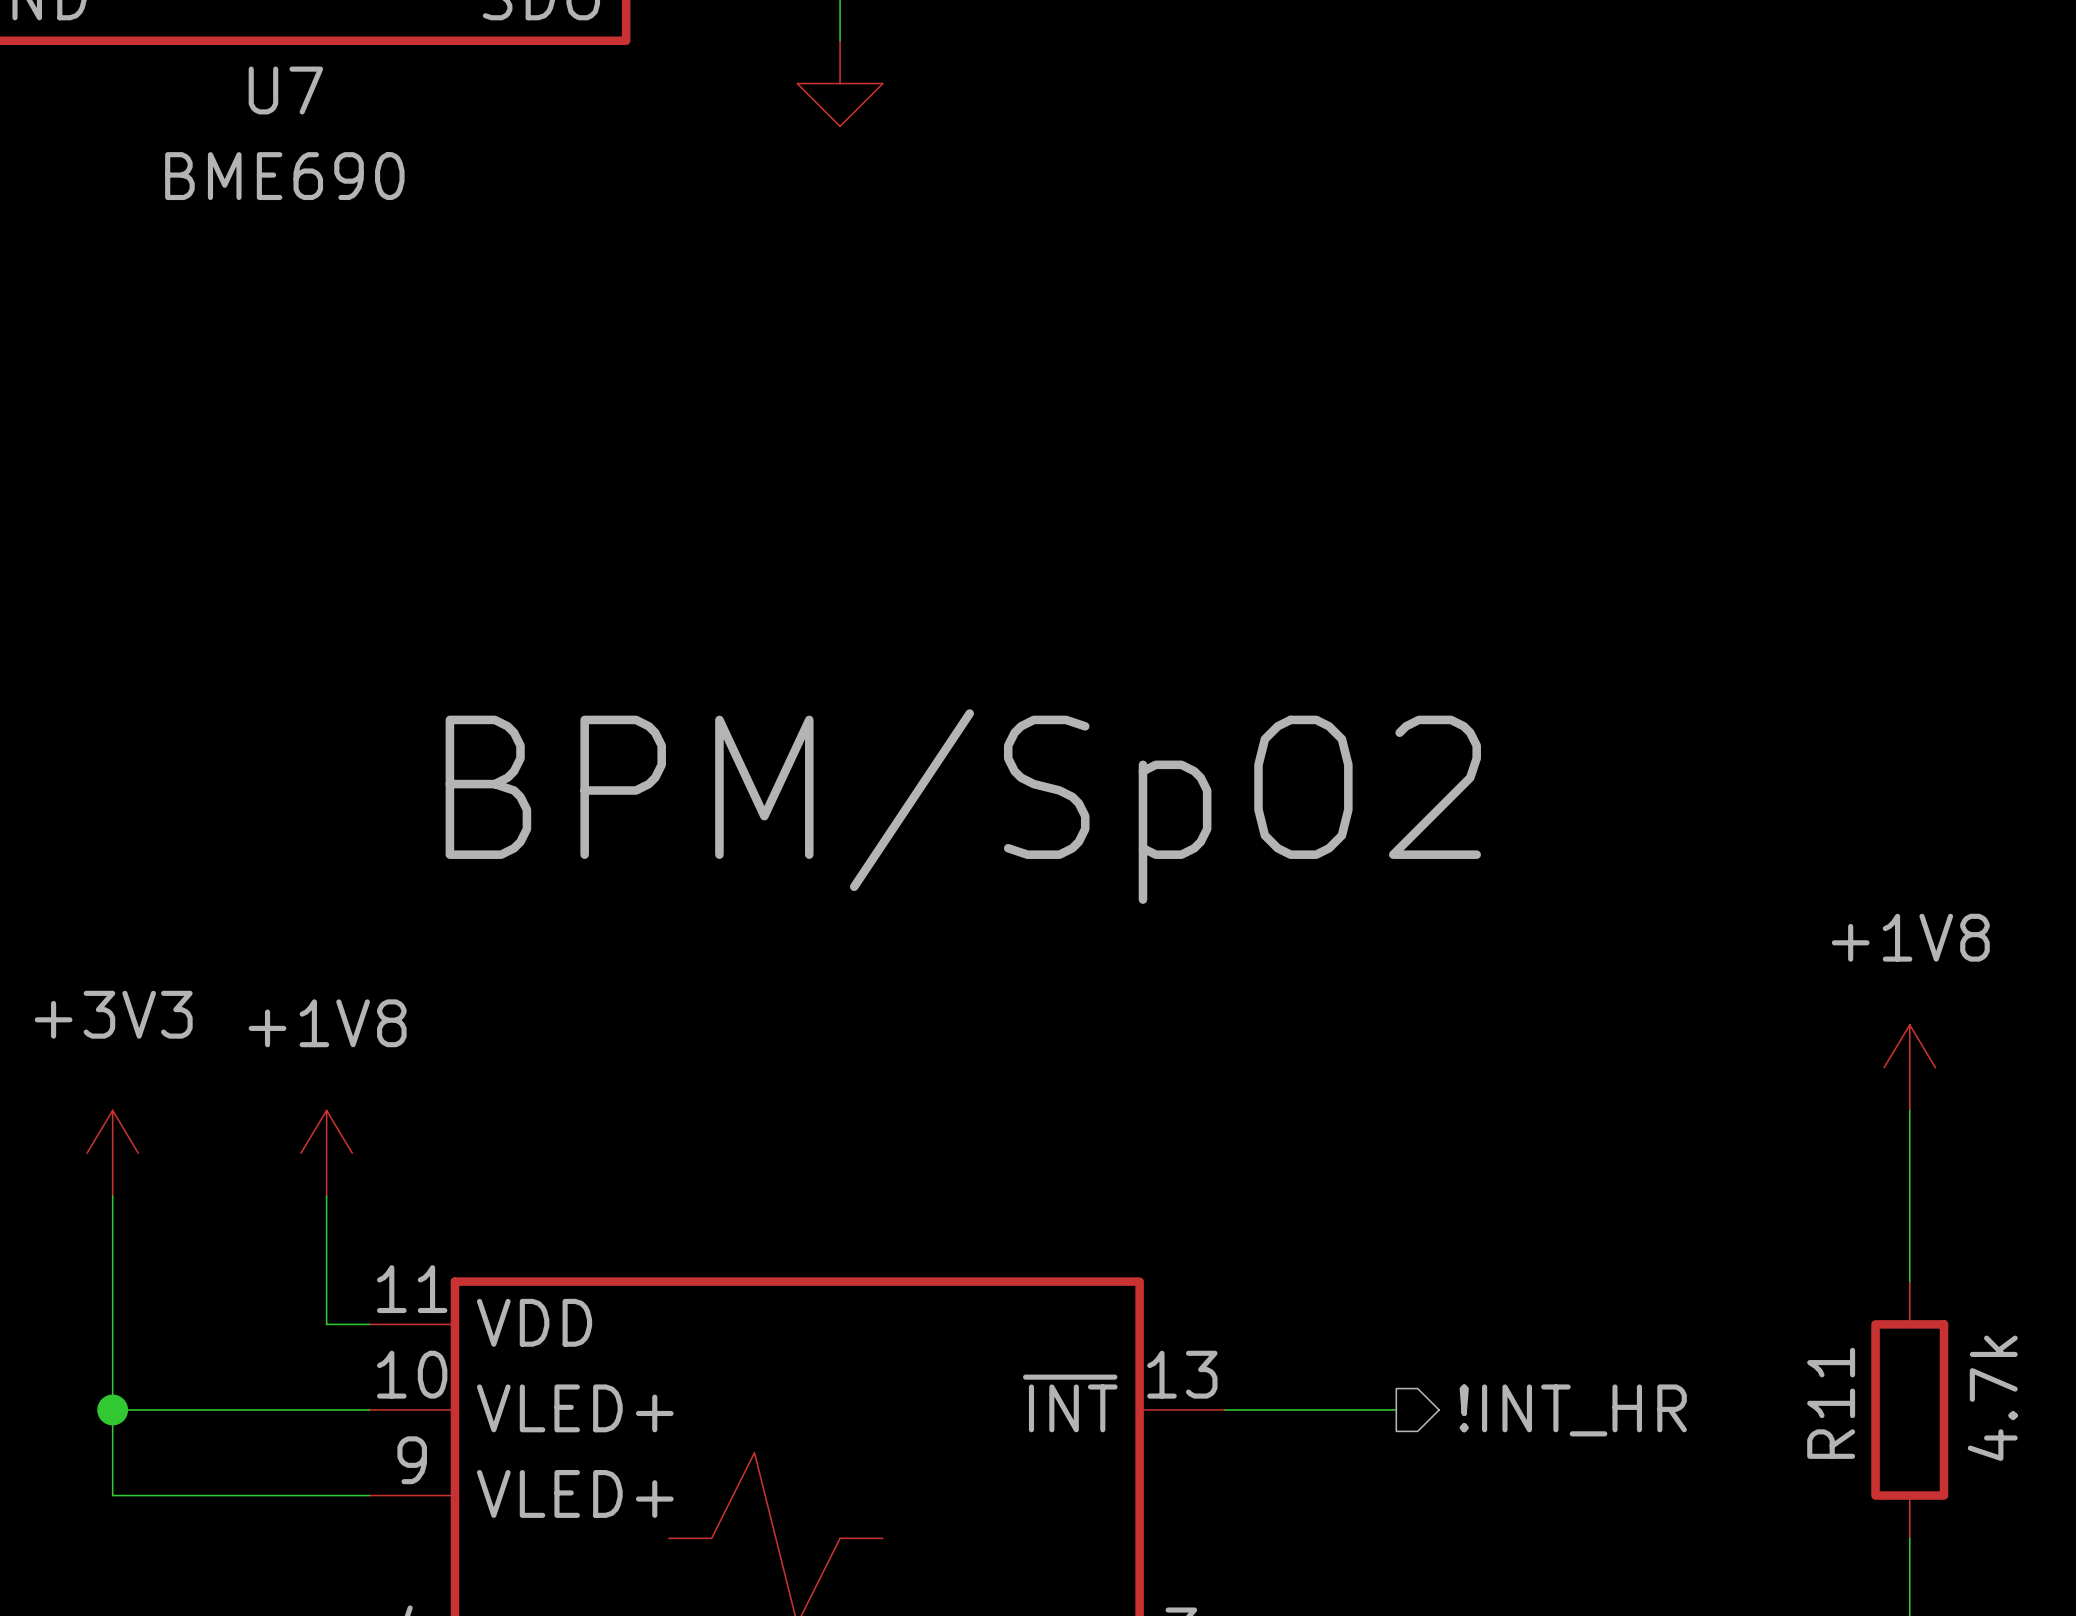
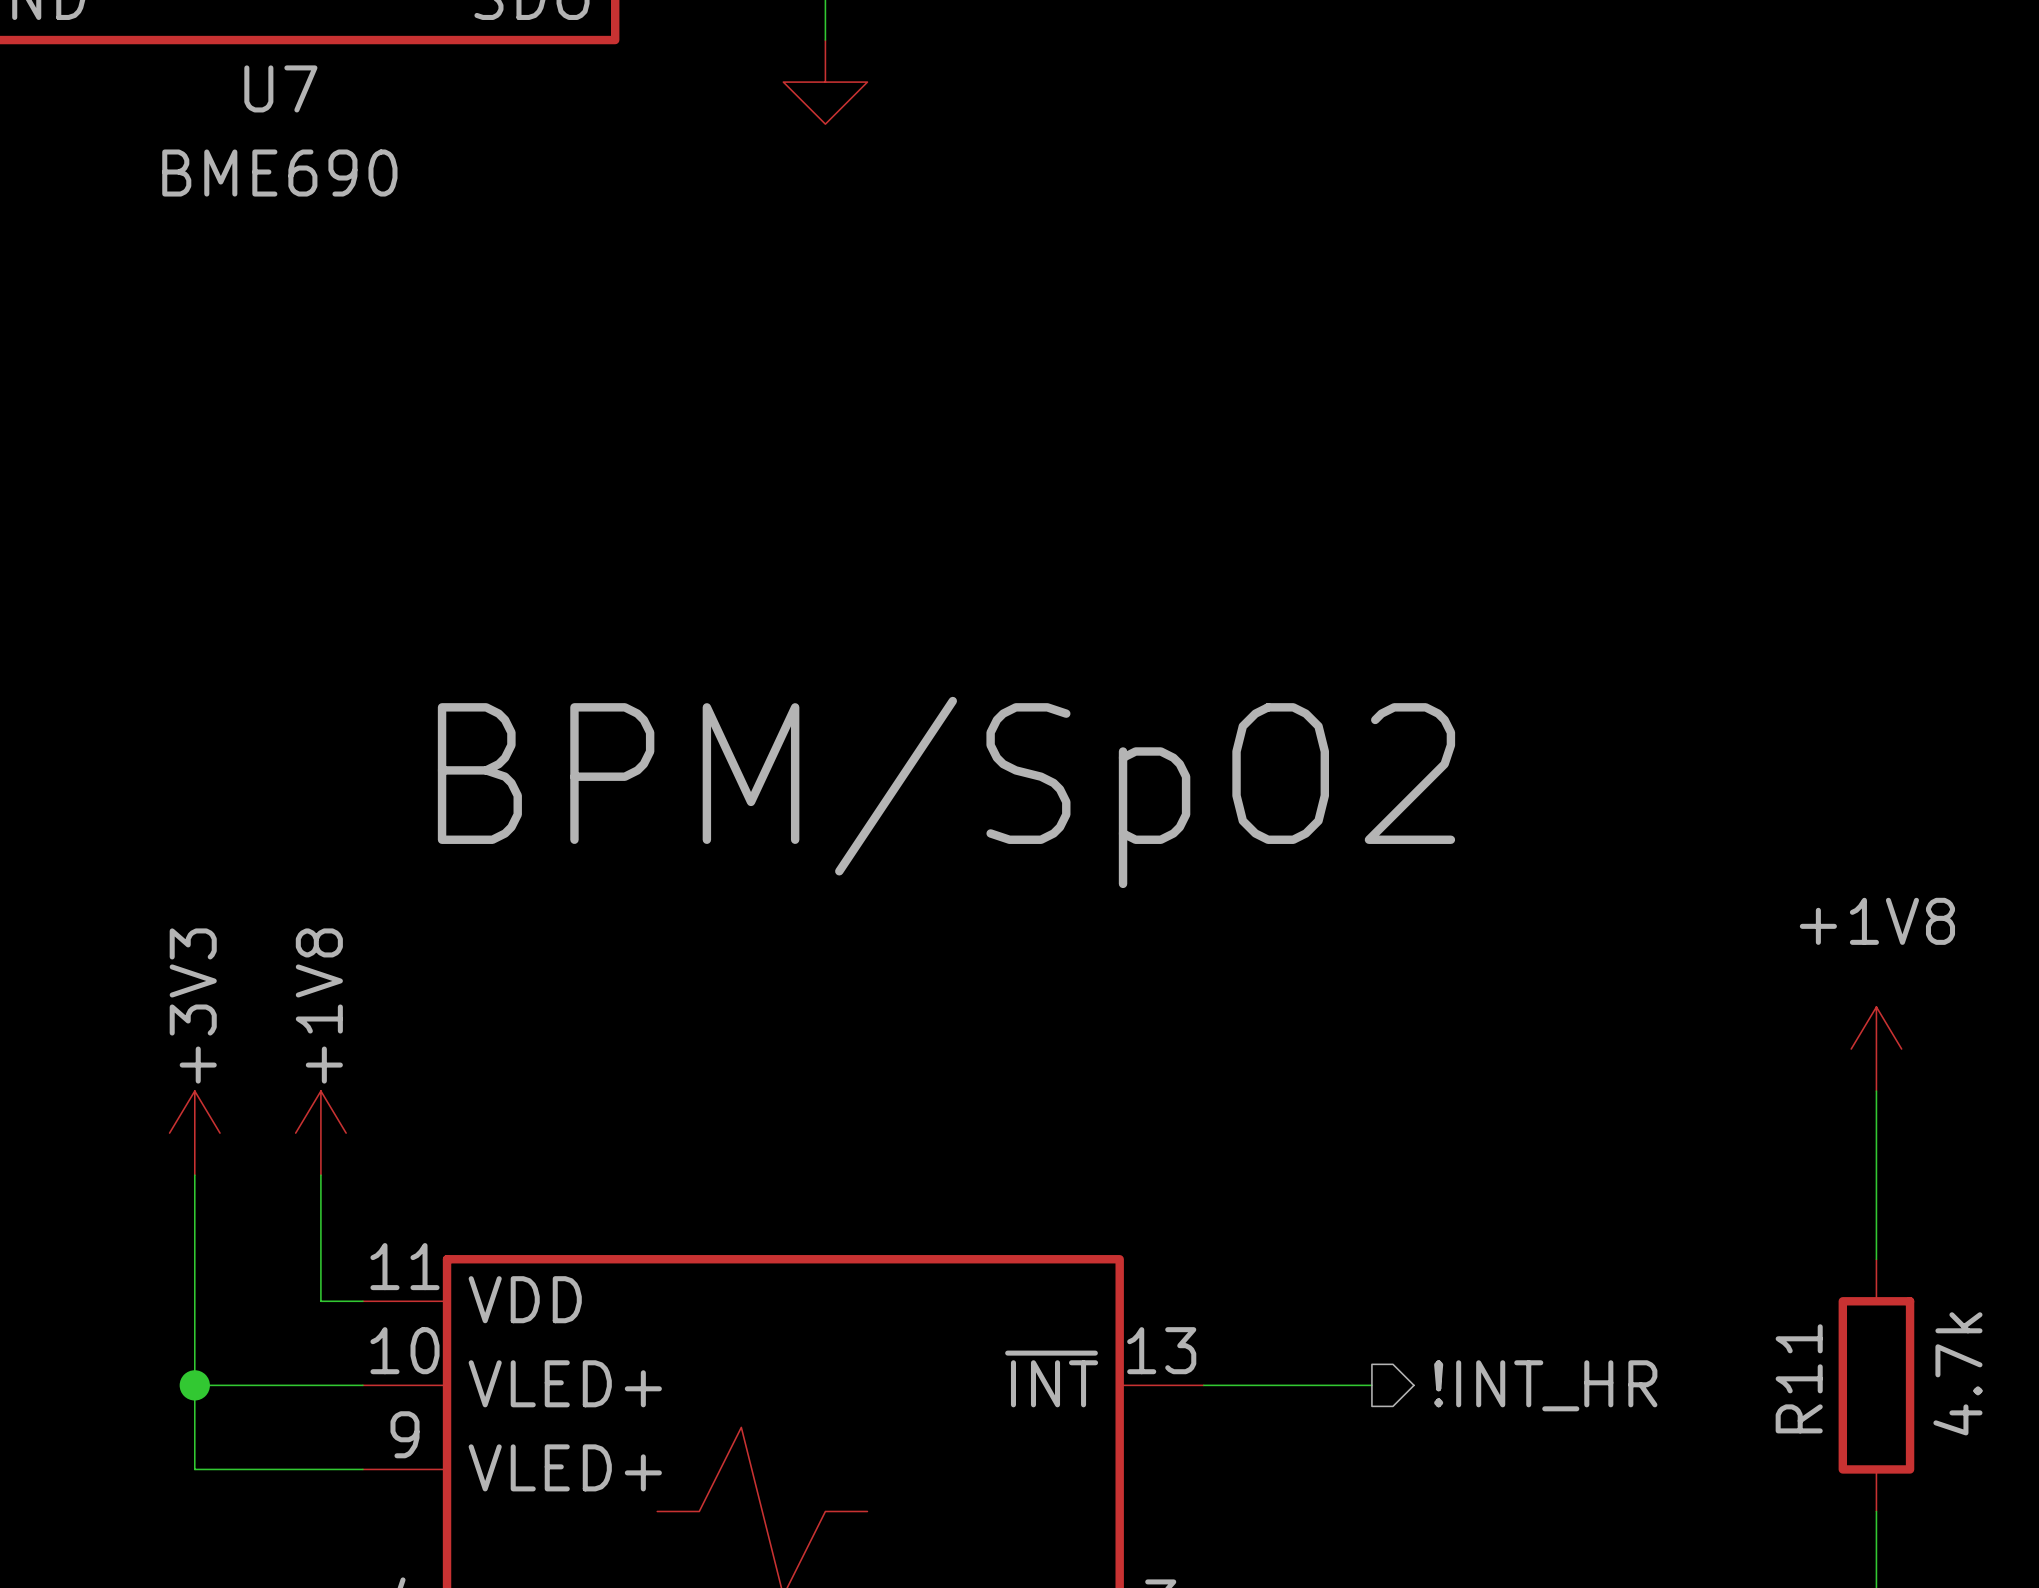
power symbol text rotation: 0° (113, 1014) -> 90° counterclockwise (193, 1005)
power symbol text rotation: 0° (327, 1023) -> 90° counterclockwise (319, 1005)
power symbol position: +3V3 (112, 1153) -> +3V3 (194, 1133)
wire: (112, 1196) (112, 1495) (198, 1495) -> (194, 1175) (194, 1469)
wire: (112, 1409) (198, 1409) -> none
junction position: (112, 1409) -> (194, 1385)

